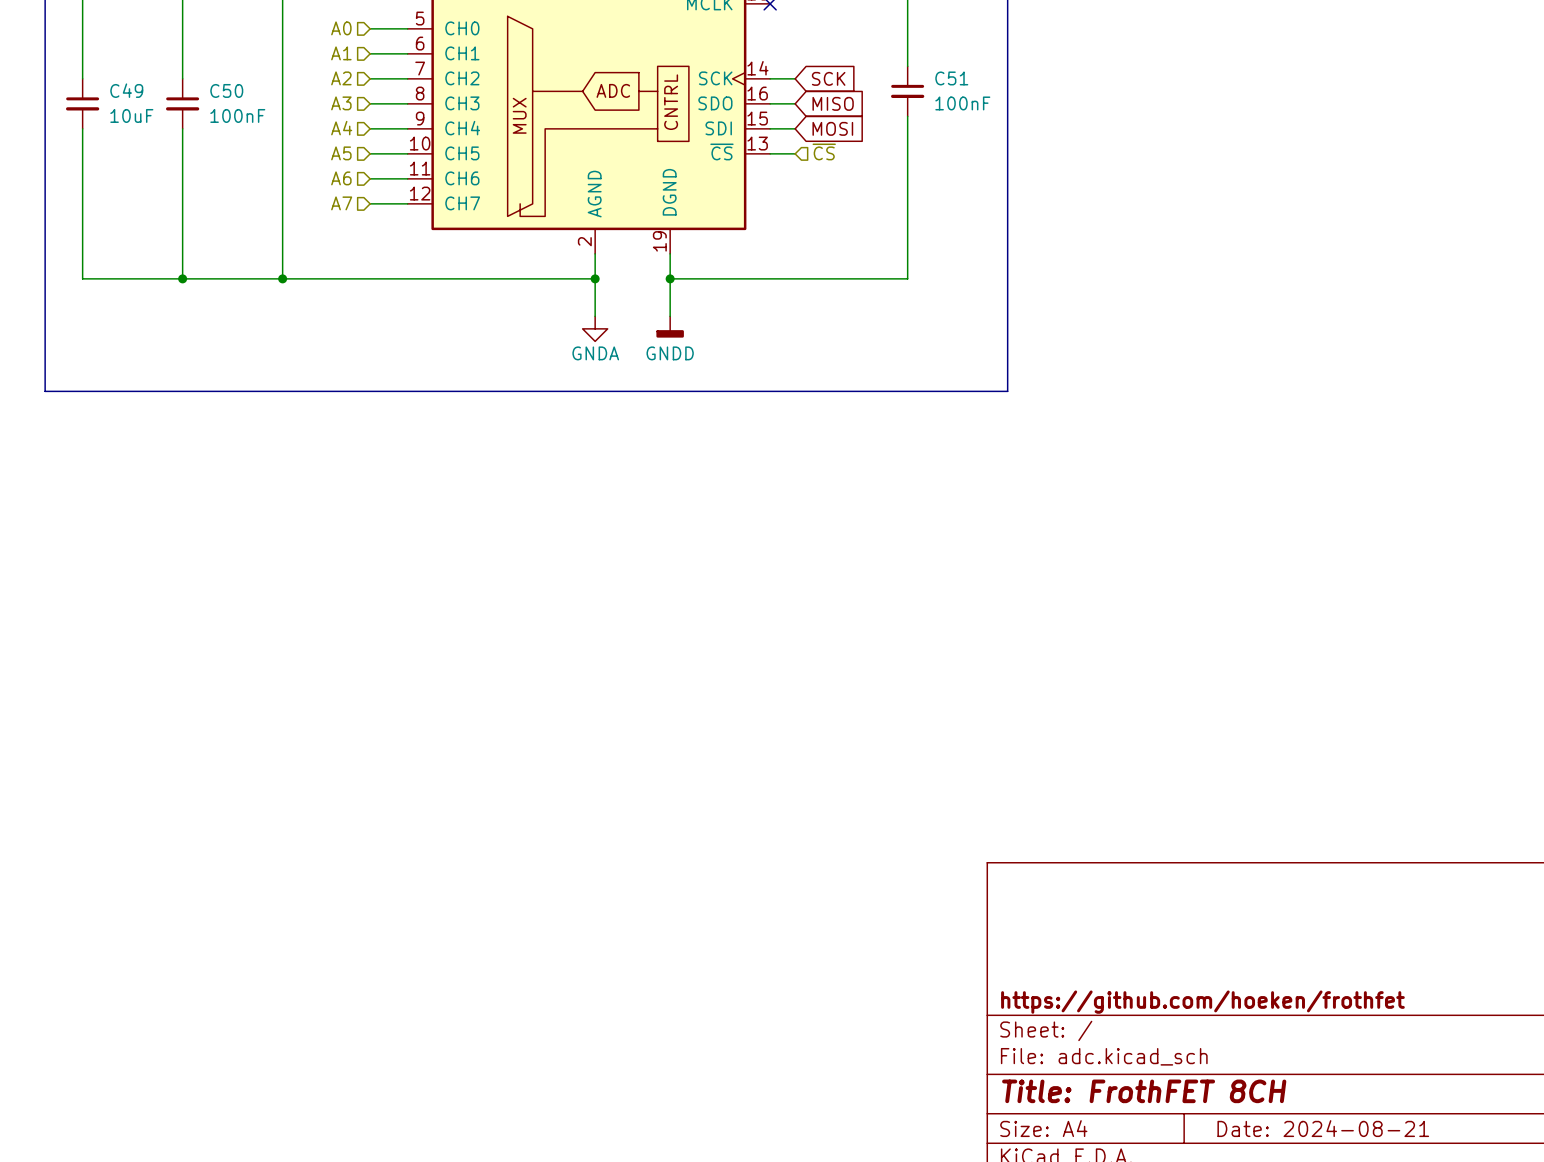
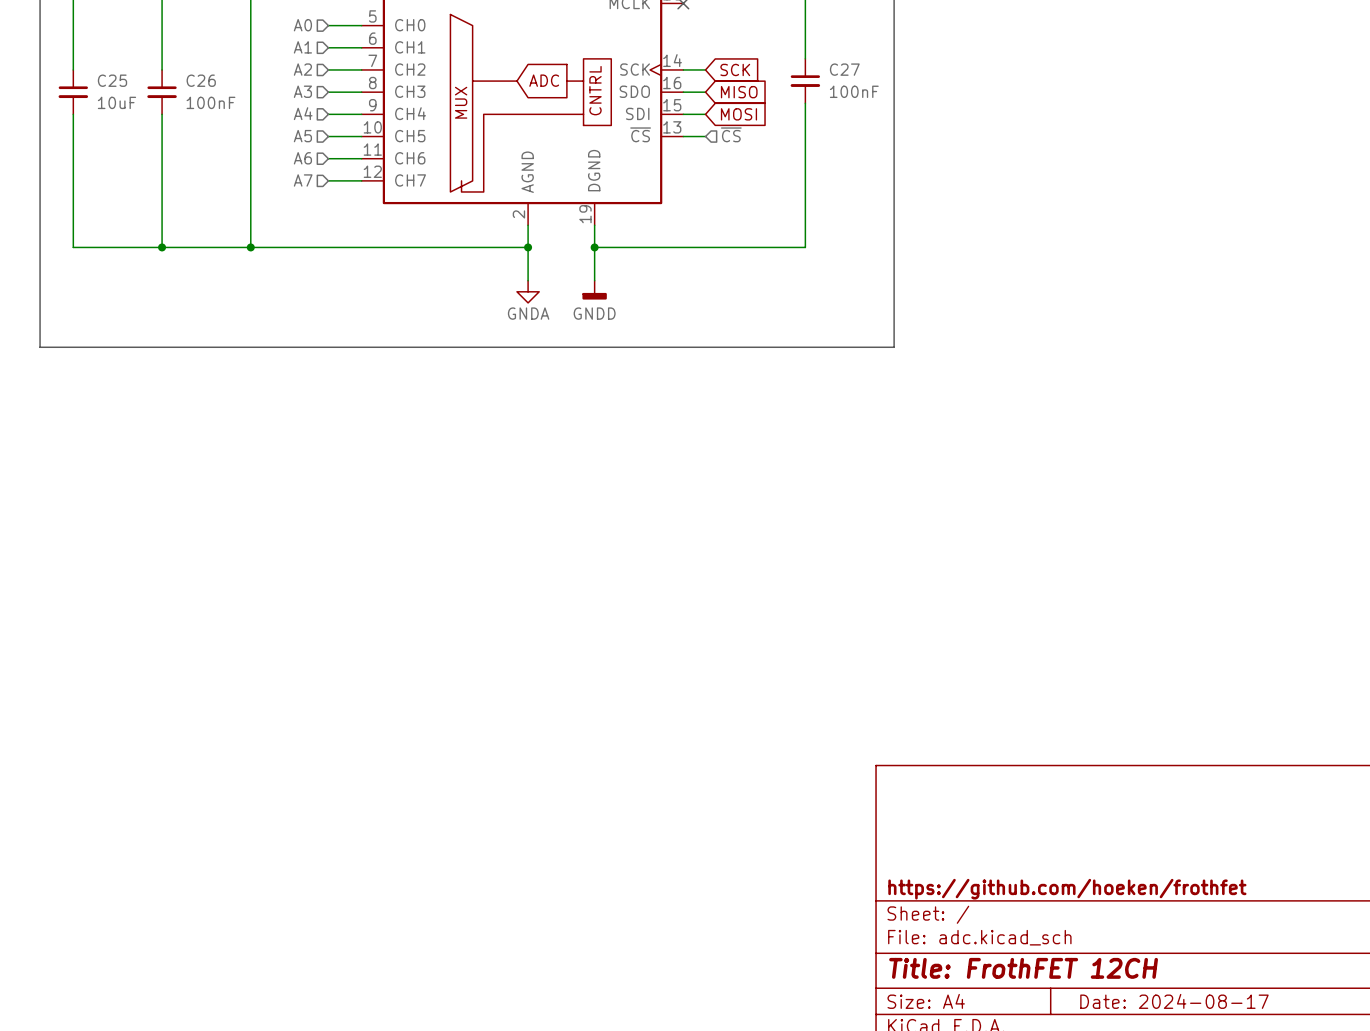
C51 name: C51 (951, 78) -> C27 (844, 69)
C49 name: C49 (126, 90) -> C25 (112, 80)
C50 name: C50 (226, 90) -> C26 (201, 80)
title block: Title: FrothFET 8CH (1144, 1091) -> Title: FrothFET 12CH (1023, 968)
title block: Date: 2024-08-21 (1323, 1128) -> Date: 2024-08-17 (1174, 1001)

